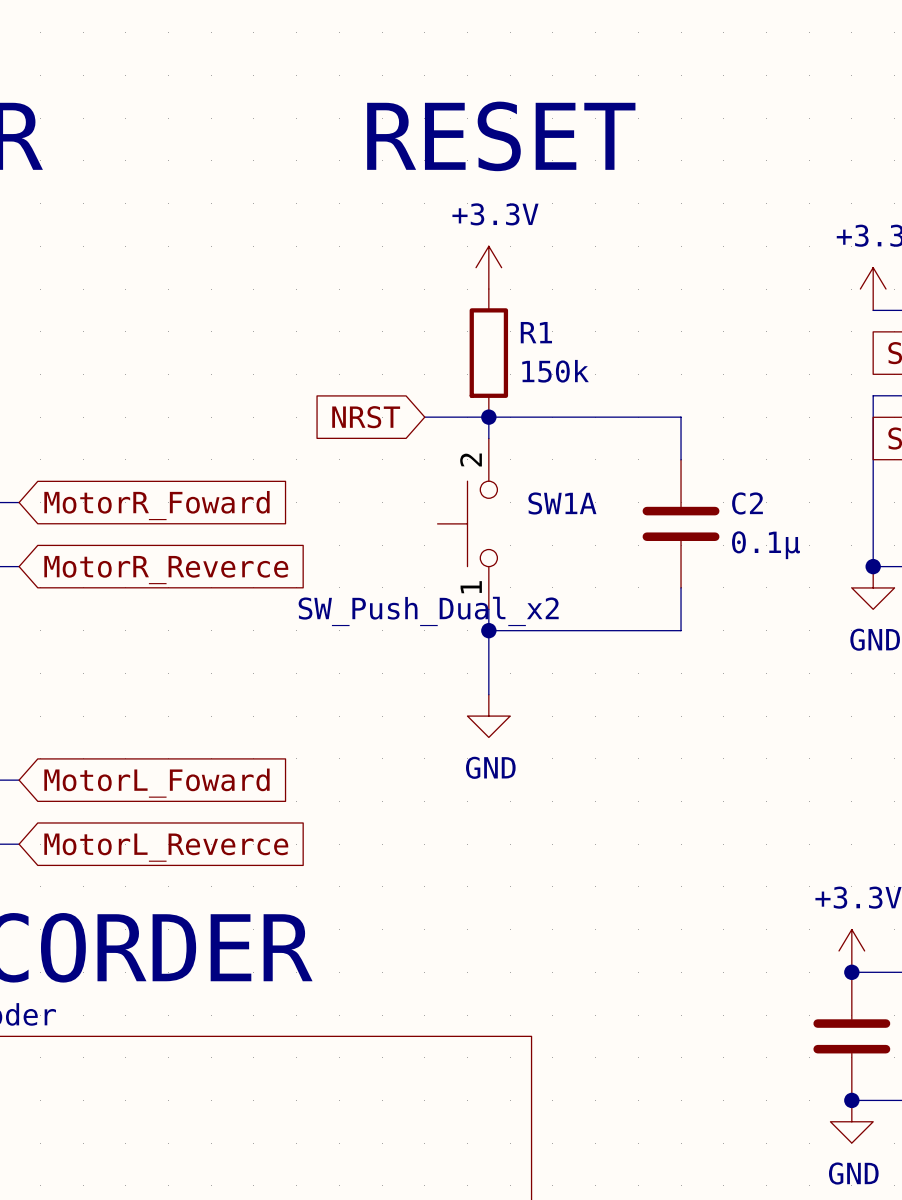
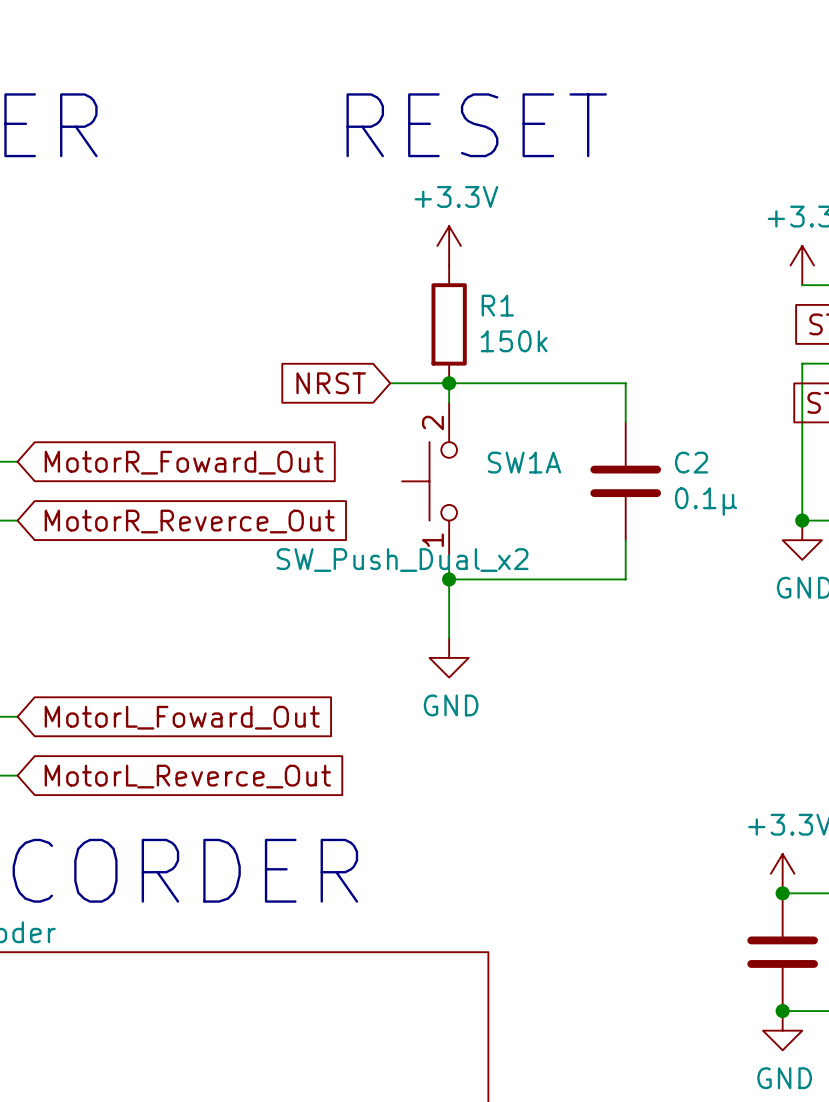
global label: MotorR_Foward (156, 505) -> MotorR_Foward_Out (184, 462)
global label: MotorR_Reverce (166, 570) -> MotorR_Reverce_Out (189, 521)
global label: MotorL_Foward (156, 783) -> MotorL_Foward_Out (182, 717)
global label: MotorL_Reverce (166, 847) -> MotorL_Reverce_Out (187, 776)

